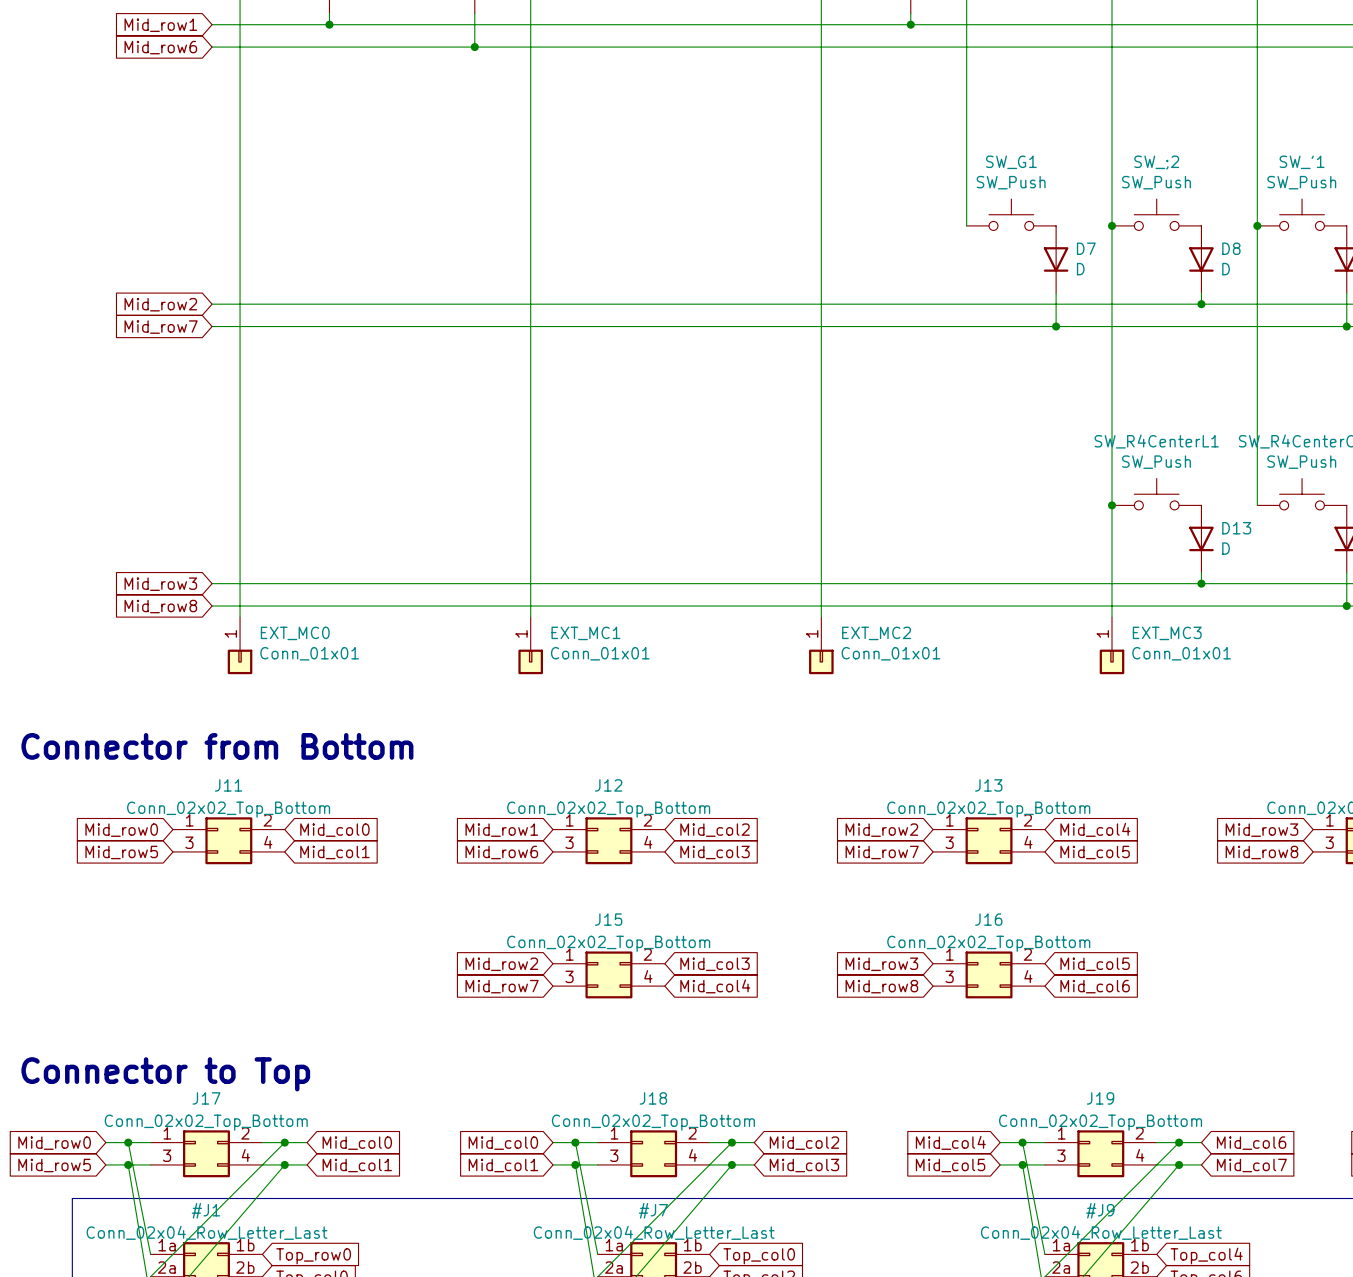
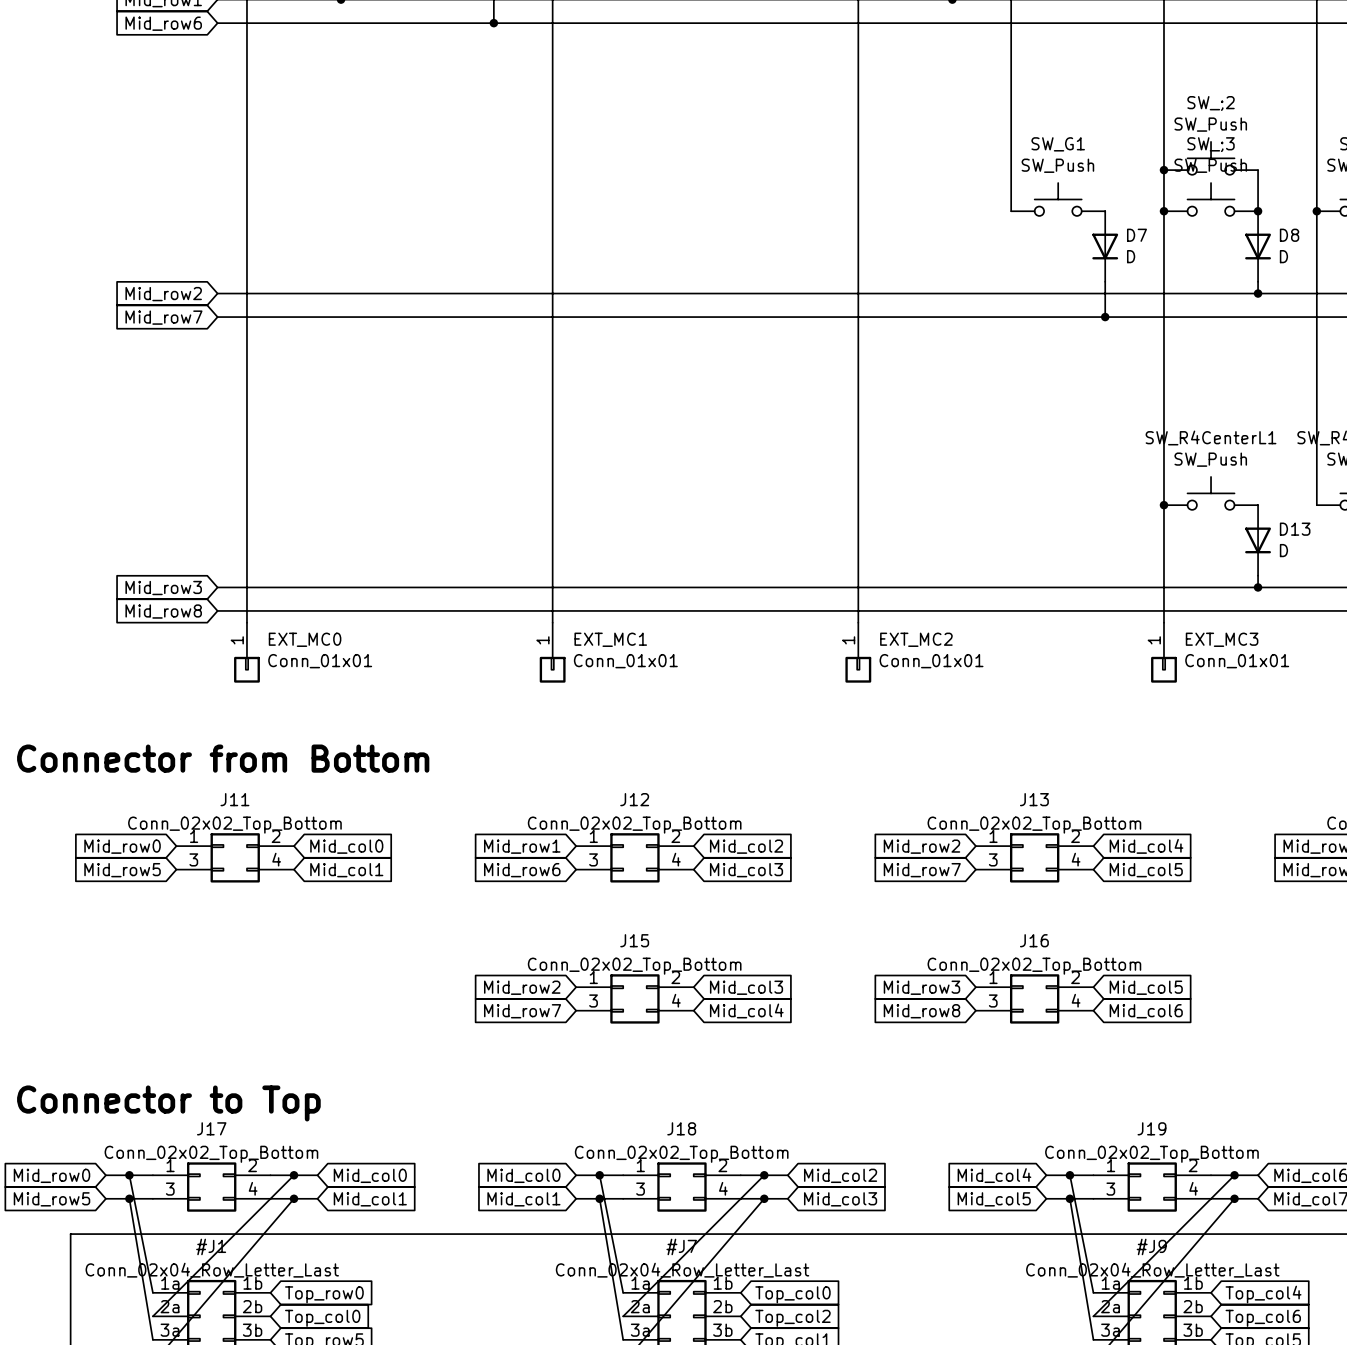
SW_;2 name: SW_;2 (1156, 162) -> SW_;3 (1211, 144)
SW_;2: none -> SW_Push (1211, 158)
junction: none -> (1163, 170)
wire: none -> (1258, 170) (1258, 211)
junction: none -> (1258, 211)

